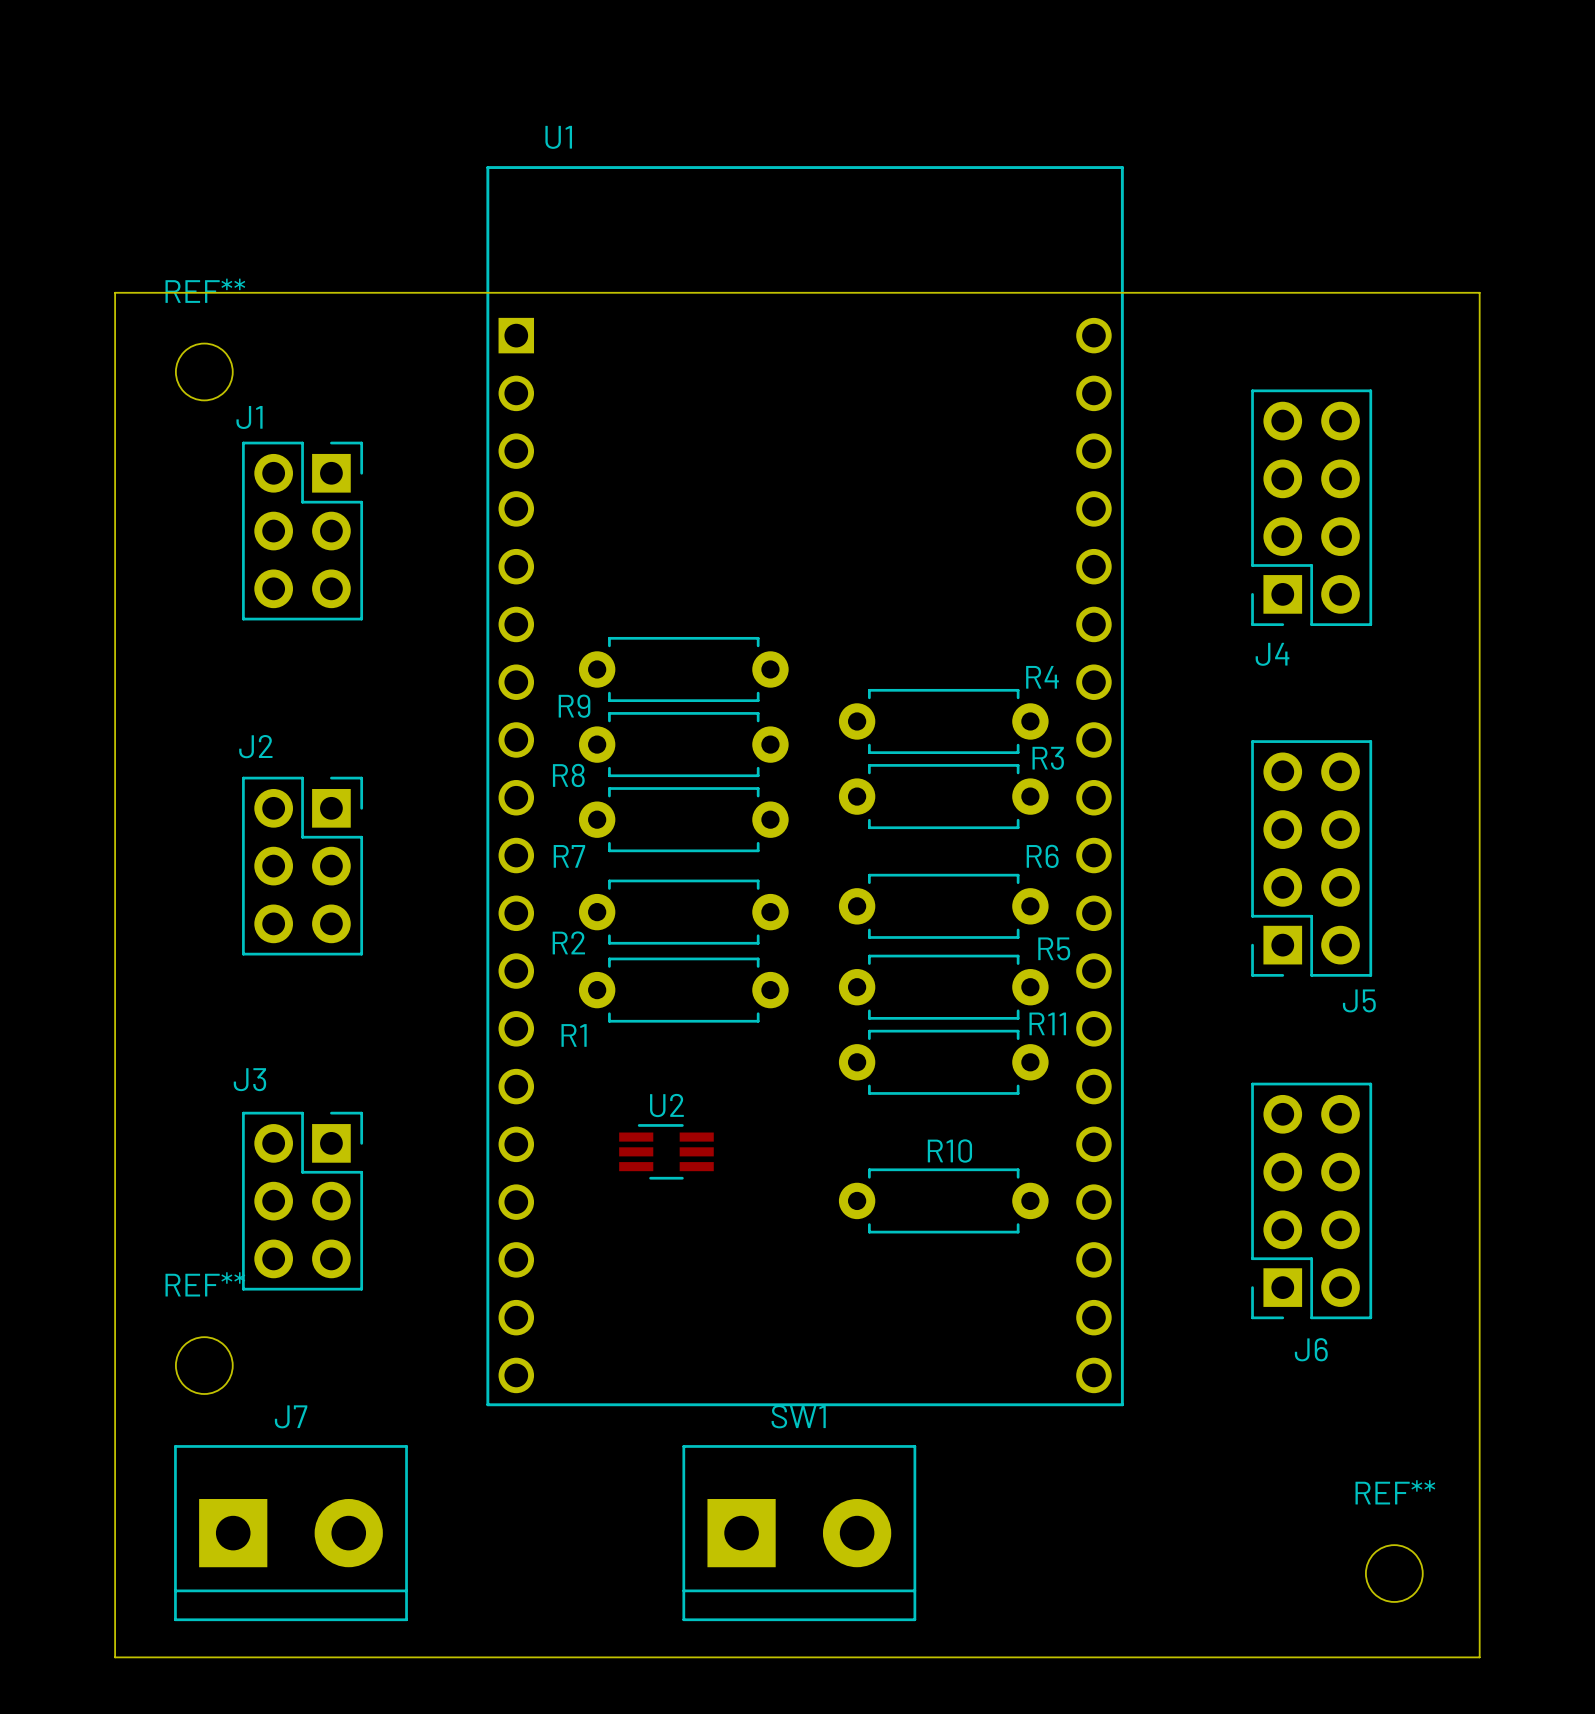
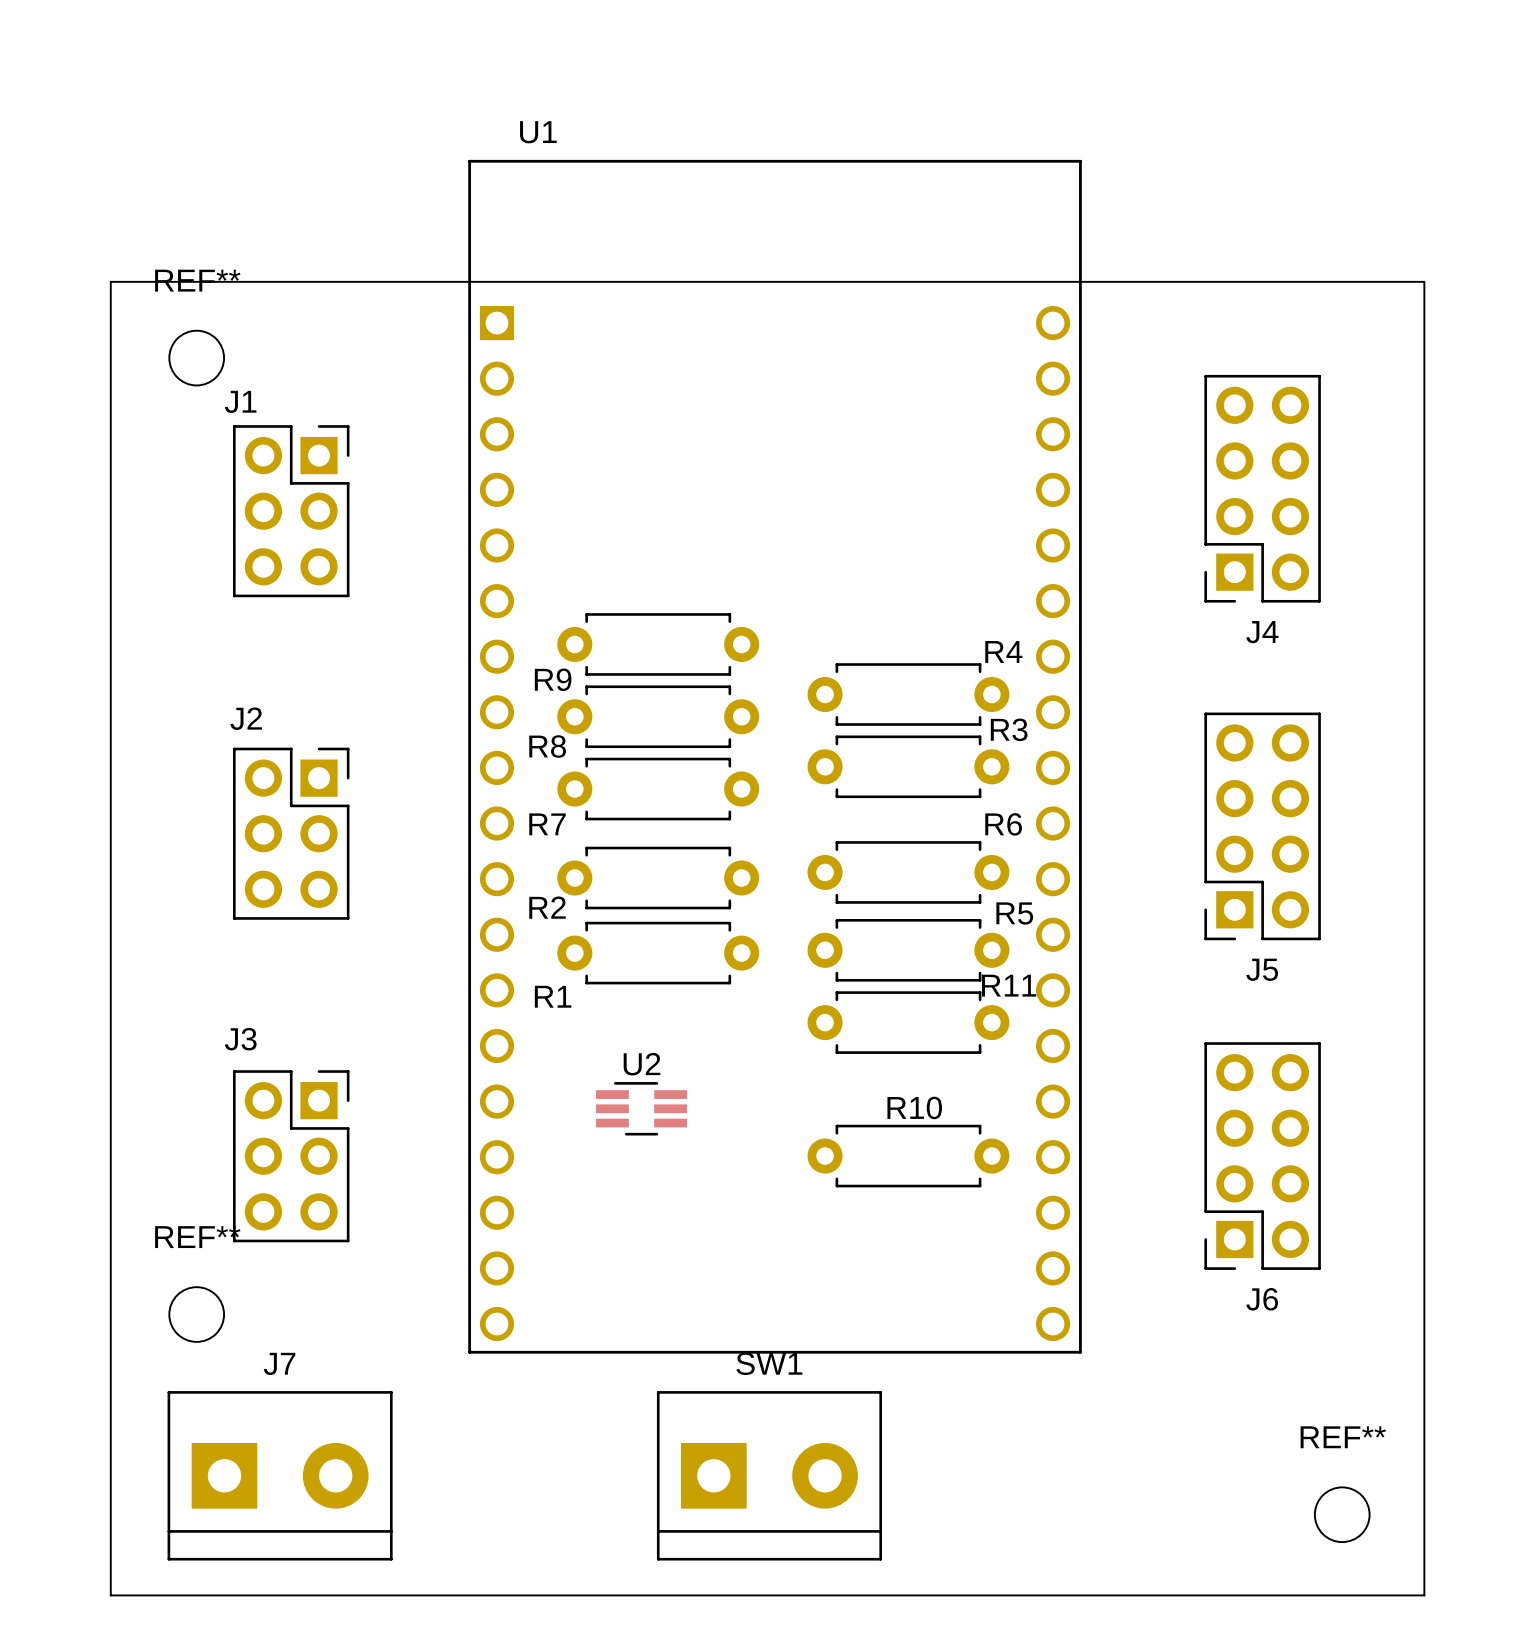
J4 name position: J4 (1272, 654) -> J4 (1262, 632)
J5 name position: J5 (1359, 1000) -> J5 (1262, 969)

